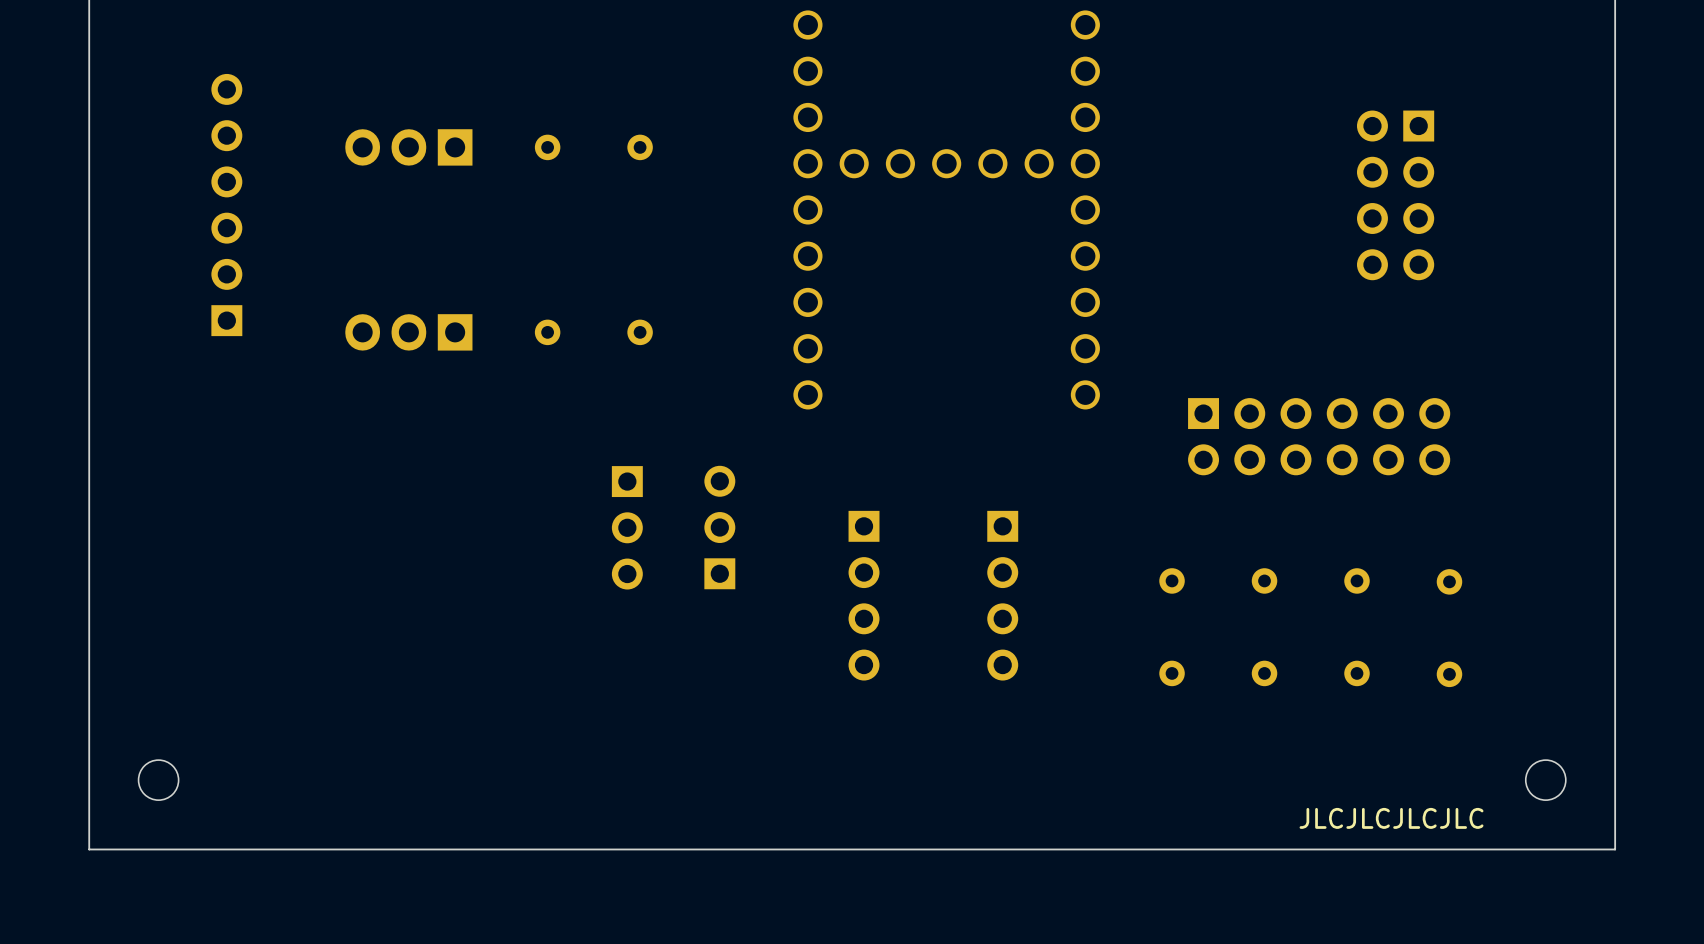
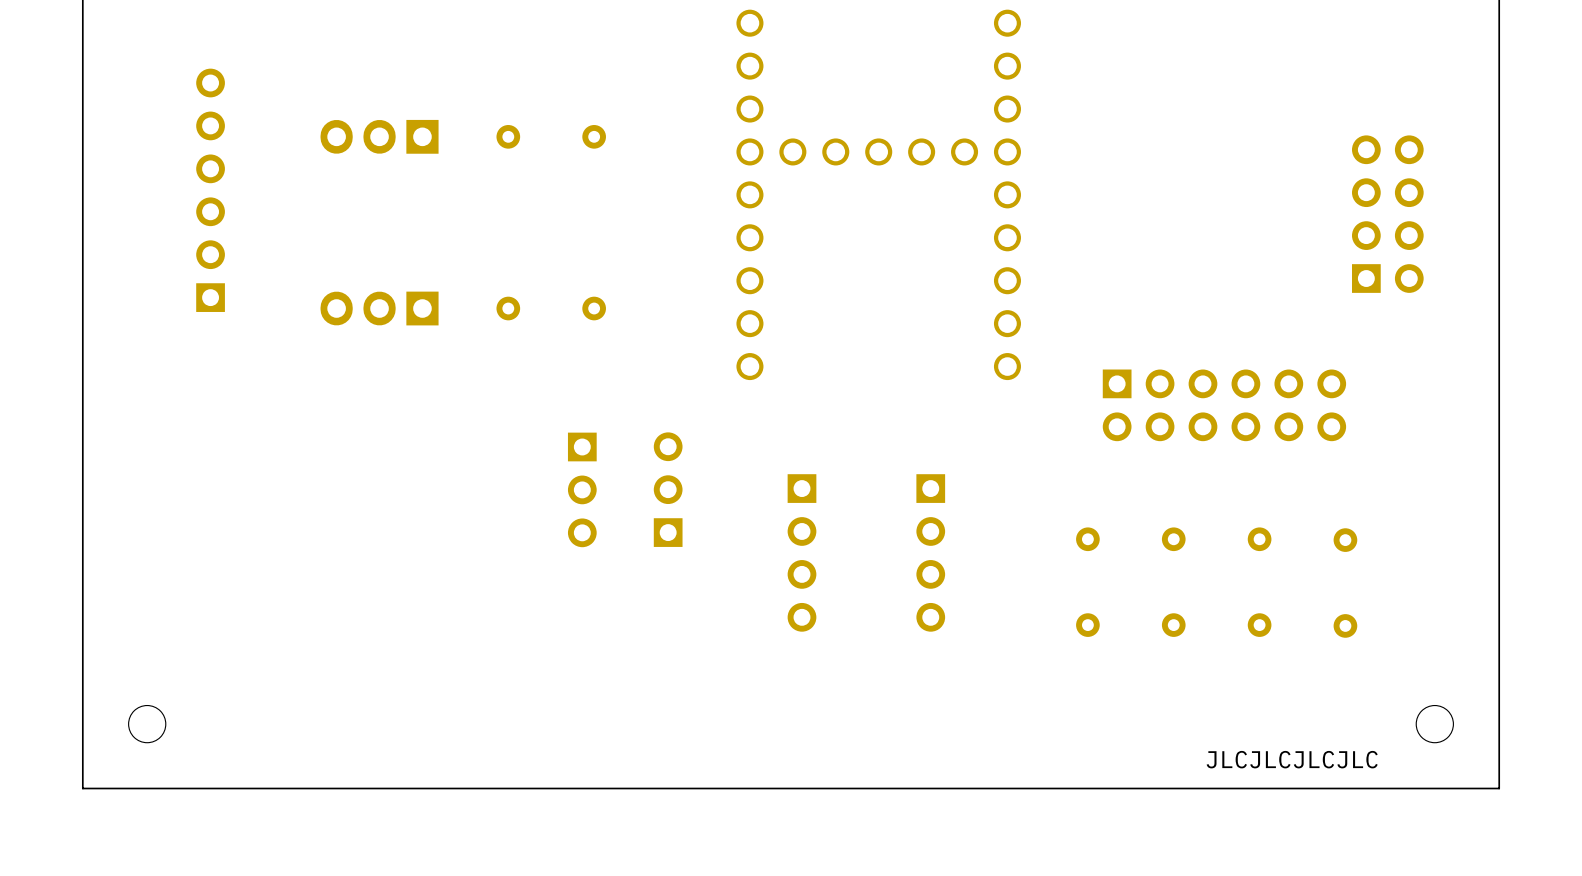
part rotation: 0° (1395, 195) -> 180° (1387, 214)
part position: (1395, 195) -> (1387, 214)

